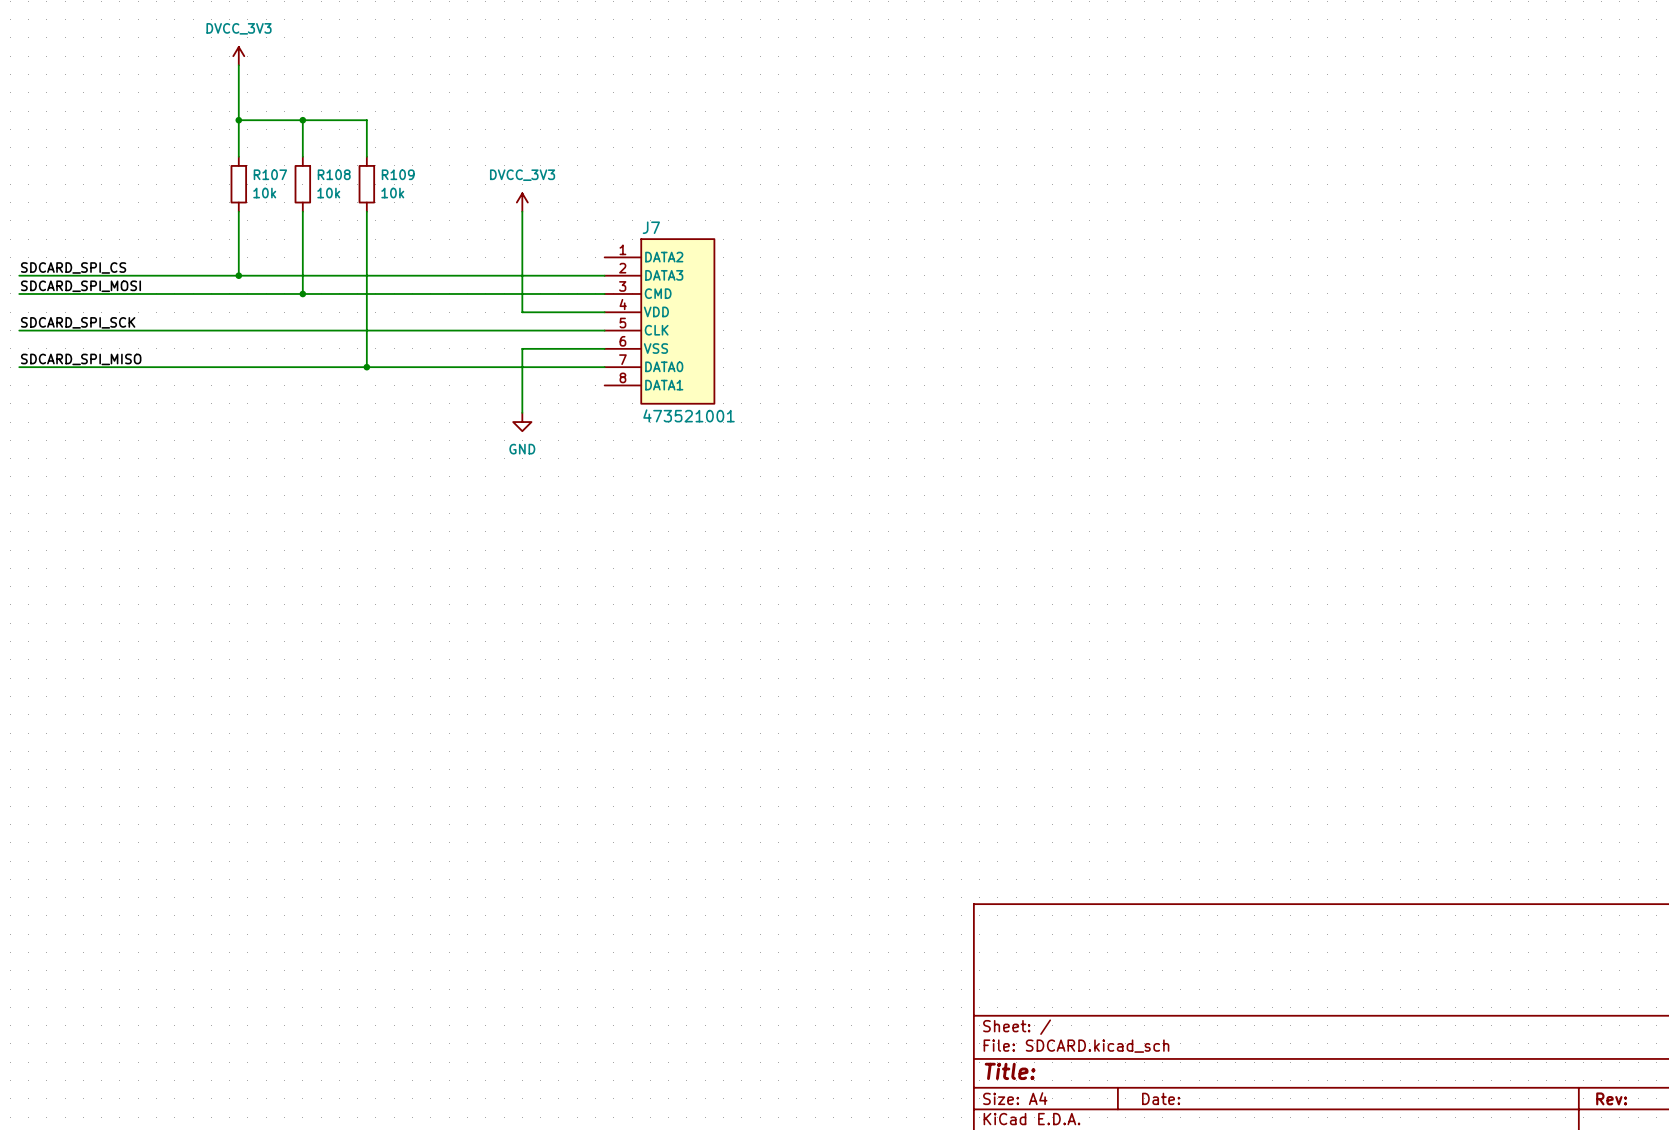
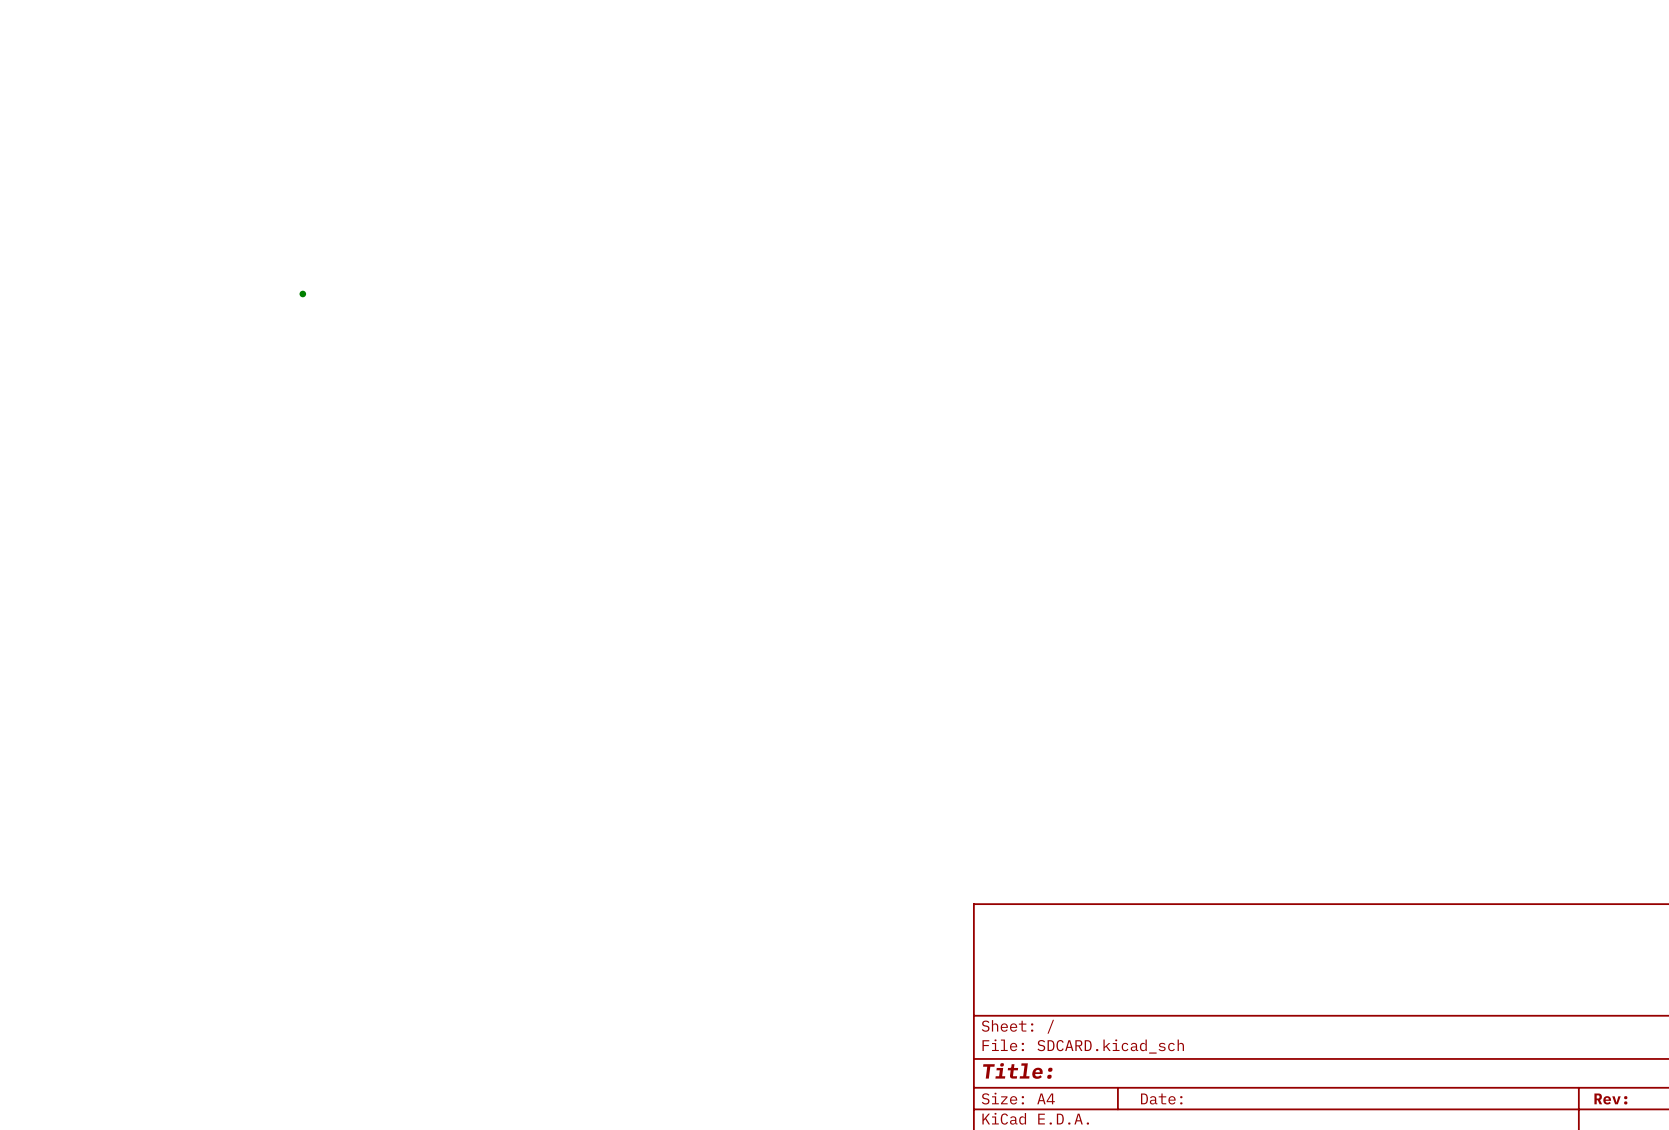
power symbol: DVCC_3V3 (238, 56) -> none
wire: (238, 65) (238, 156) -> none
wire: (238, 120) (366, 120) (366, 156) -> none
junction: (238, 120) -> none
wire: (302, 120) (302, 156) -> none
junction: (302, 120) -> none
R107: 10k (238, 184) -> none
R108: 10k (302, 184) -> none
R109: 10k (366, 184) -> none
power symbol: DVCC_3V3 (522, 202) -> none
wire: (238, 211) (238, 275) -> none
wire: (302, 211) (302, 293) -> none
wire: (366, 211) (366, 367) -> none
wire: (522, 211) (522, 312) (604, 312) -> none
label: SDCARD_SPI_CS (73, 267) -> none
wire: (19, 275) (604, 275) -> none
junction: (238, 275) -> none
label: SDCARD_SPI_MOSI (80, 286) -> none
wire: (19, 293) (604, 293) -> none
J7: 473521001 (659, 321) -> none
label: SDCARD_SPI_SCK (78, 322) -> none
wire: (19, 330) (604, 330) -> none
wire: (604, 348) (522, 348) (522, 412) -> none
label: SDCARD_SPI_MISO (81, 359) -> none
wire: (19, 367) (604, 367) -> none
junction: (366, 367) -> none
power symbol: GND (522, 422) -> none

